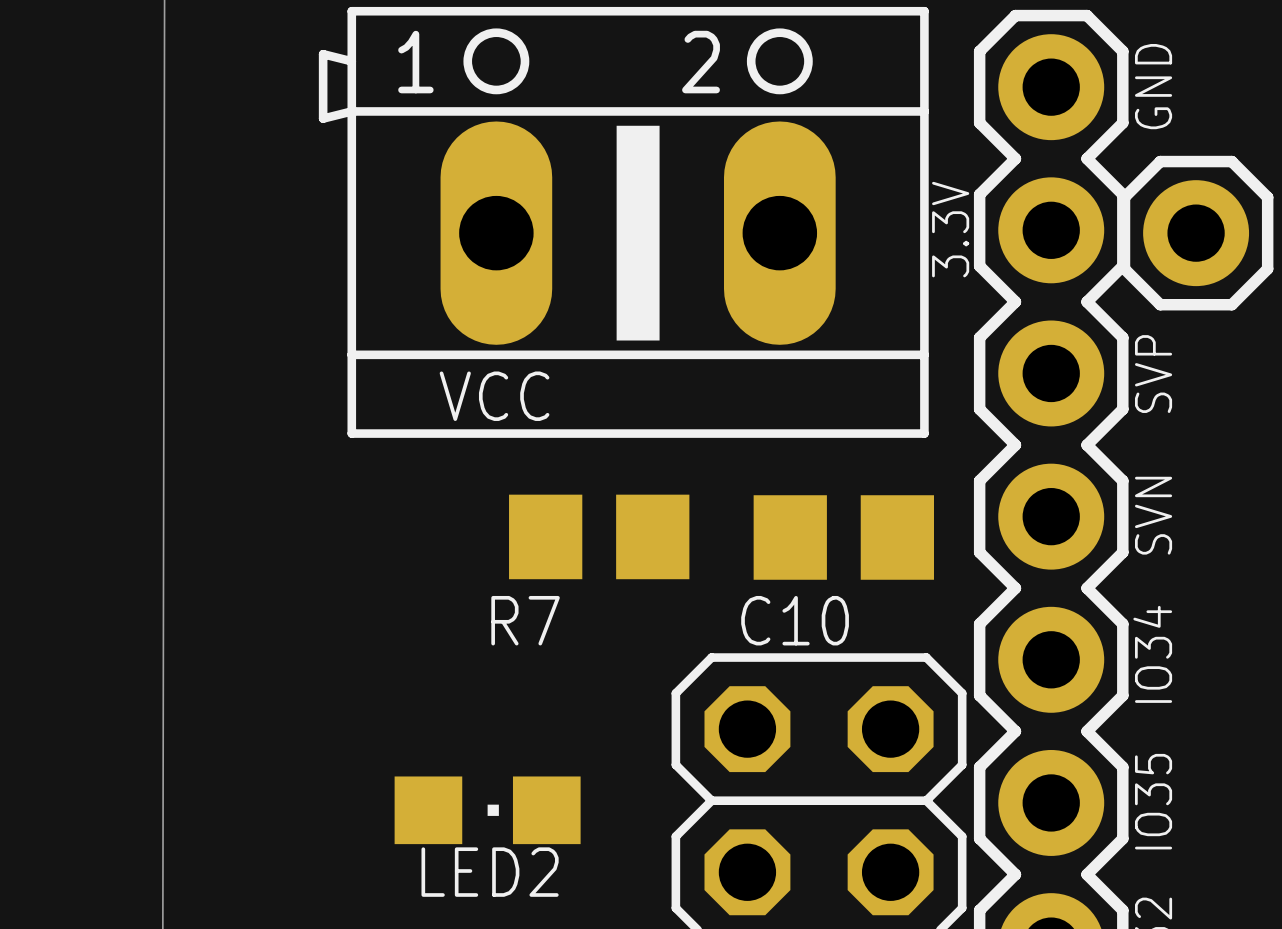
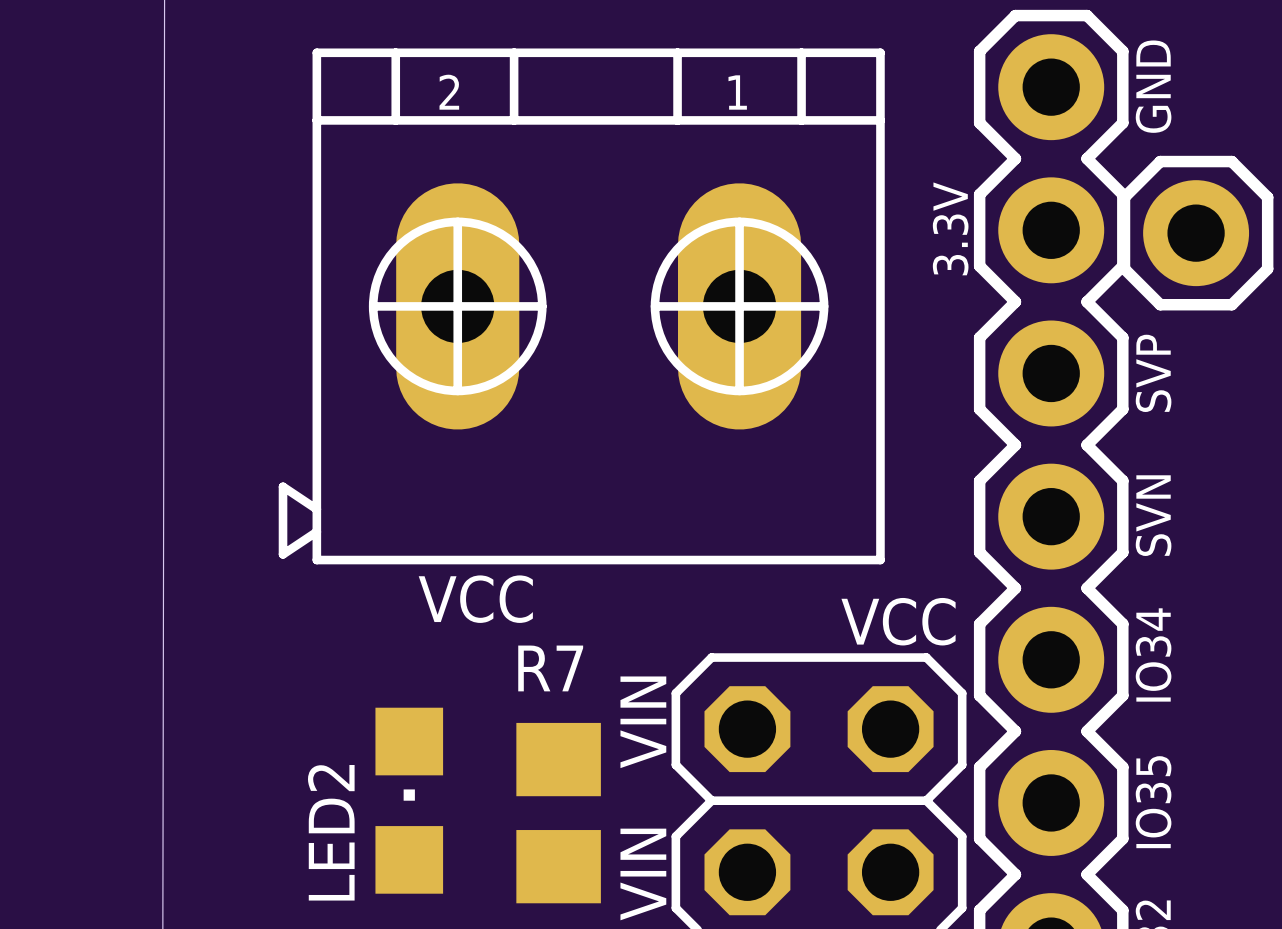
part: (623, 222) -> none
part: none -> (581, 306)
text position: VCC (494, 396) -> VCC (475, 599)
R7 rotation: 0° (599, 536) -> 90° clockwise (558, 813)
R7 position: (599, 536) -> (558, 813)
C10: (843, 537) -> none
text: none -> VCC (898, 621)
text: none -> VIN (643, 722)
LED2 rotation: 0° (487, 810) -> 90° counterclockwise (409, 800)
text: none -> VIN (643, 874)

